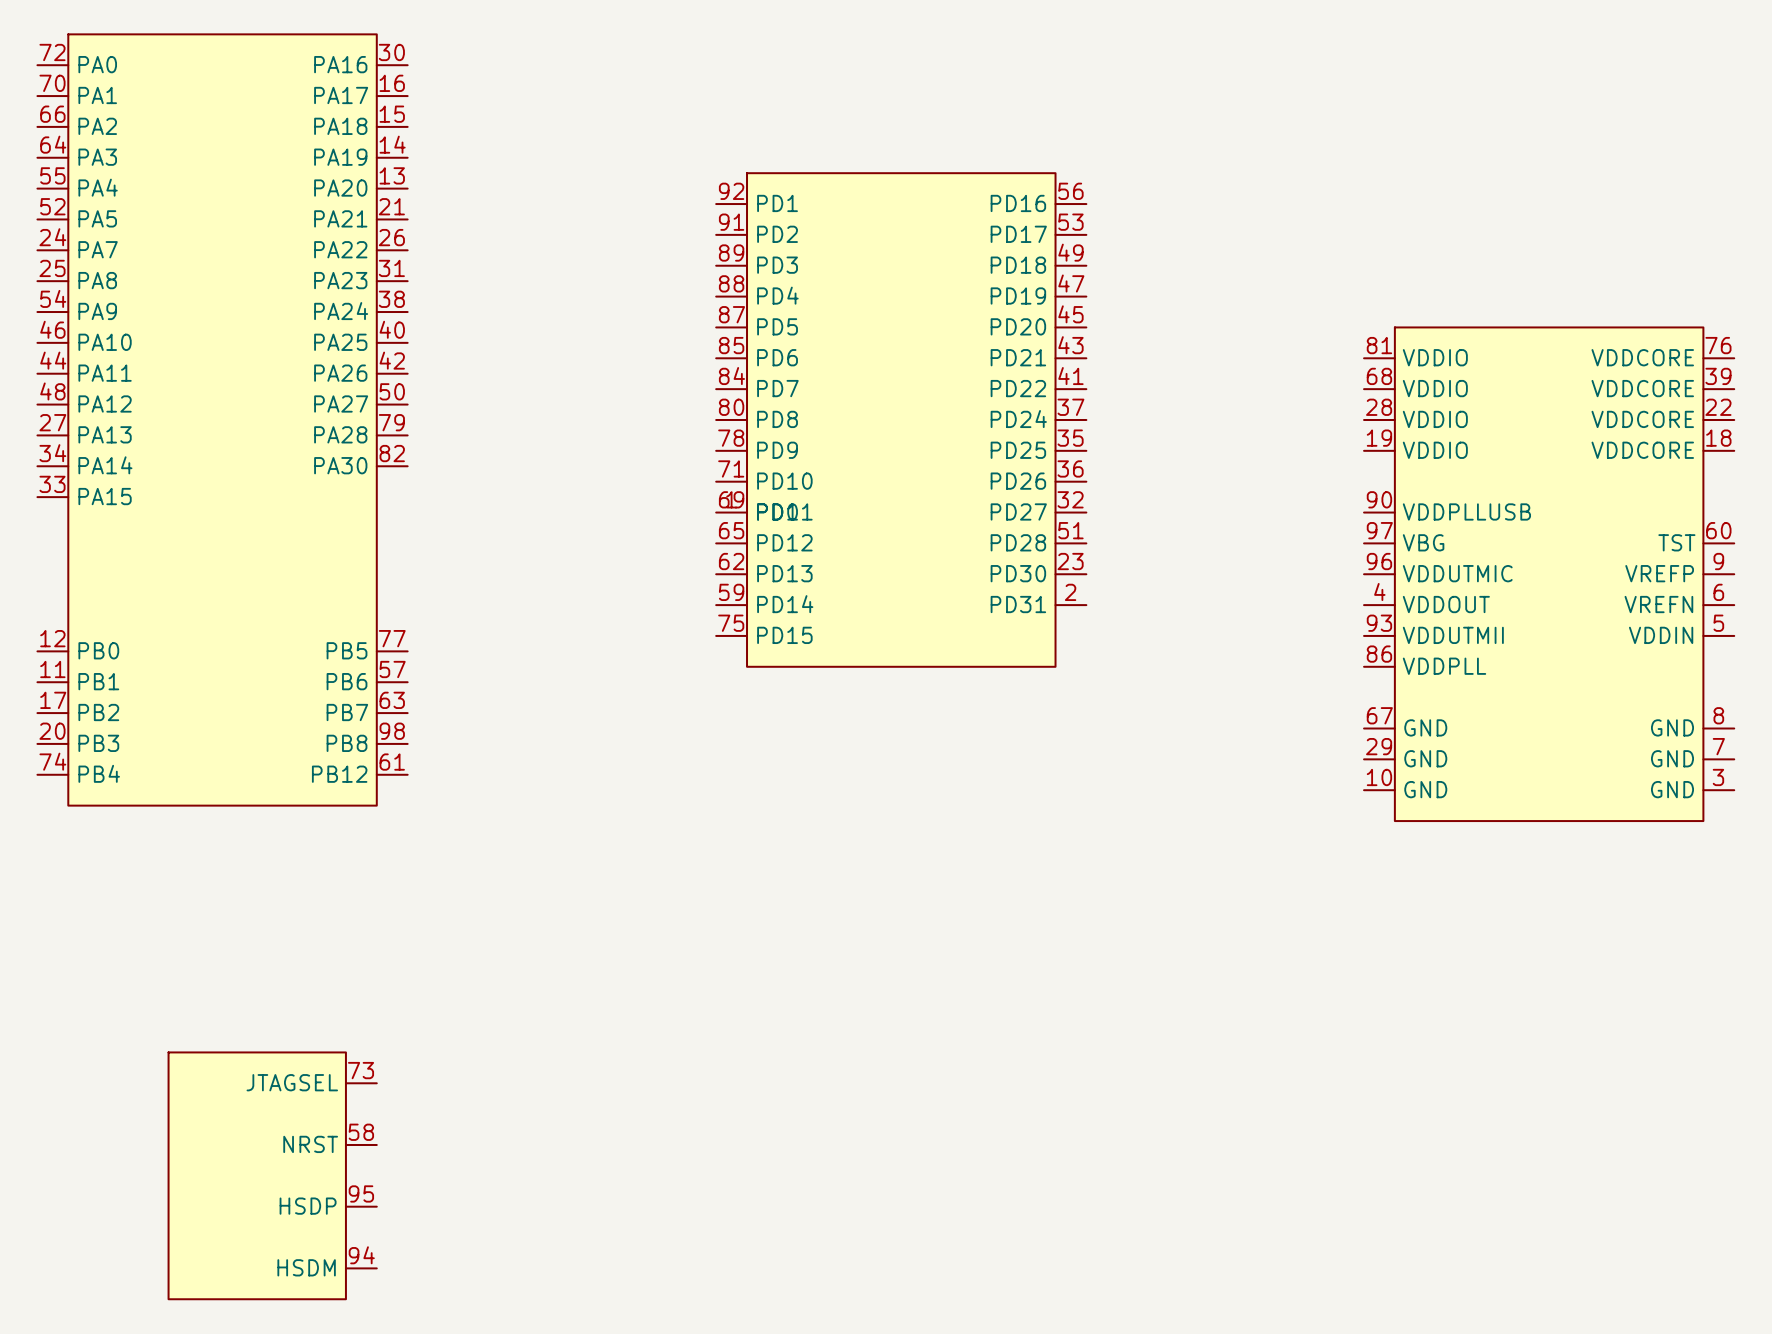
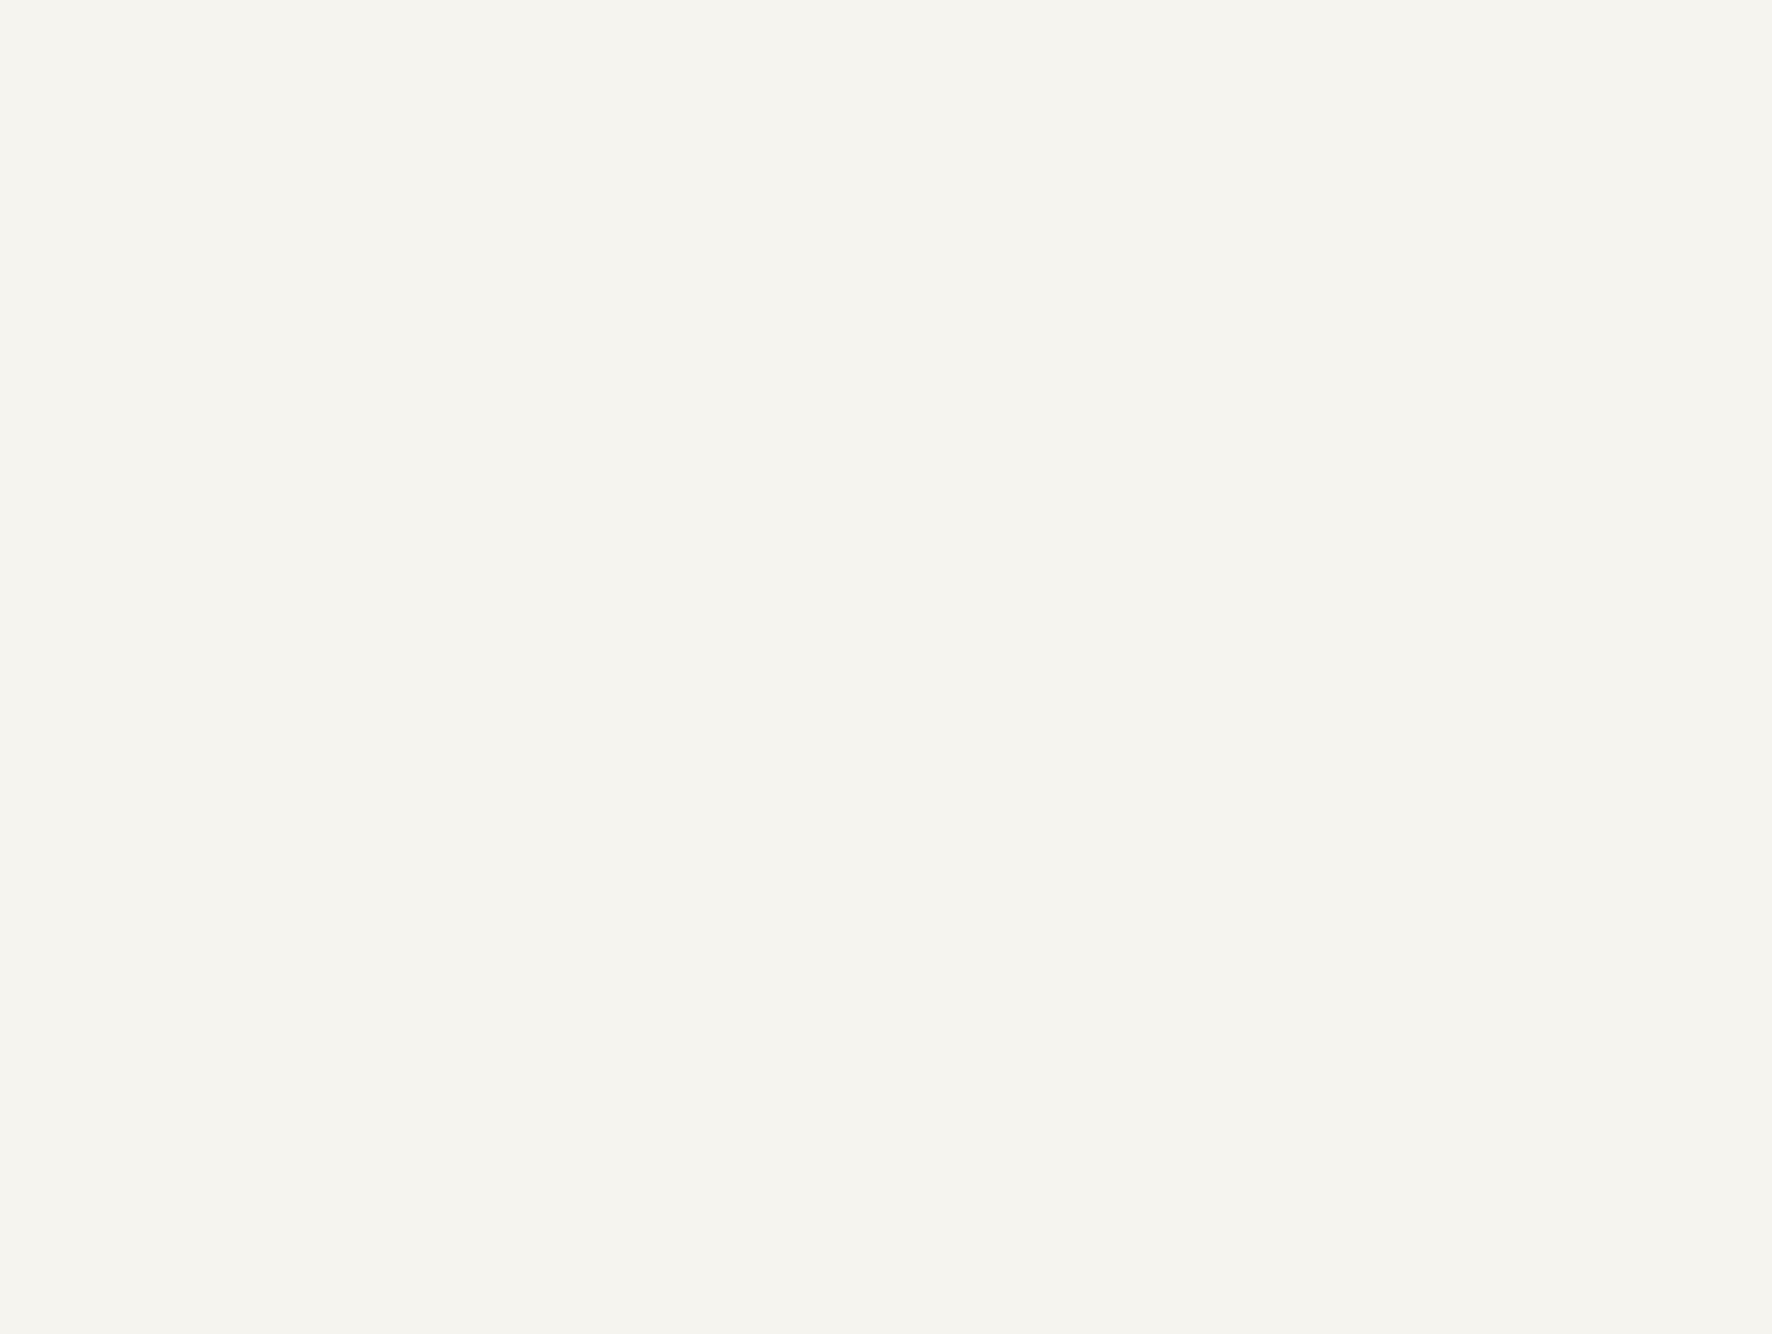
part: (222, 419) -> none
part: (901, 419) -> none
part: (1549, 574) -> none
part: (272, 1175) -> none

